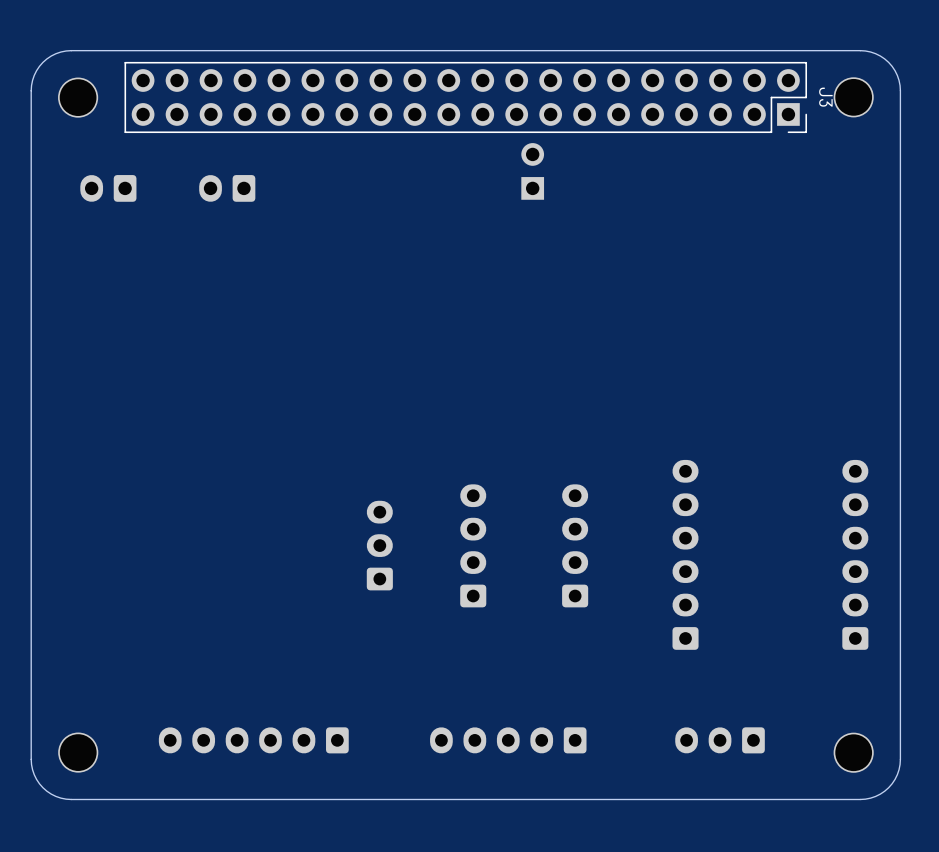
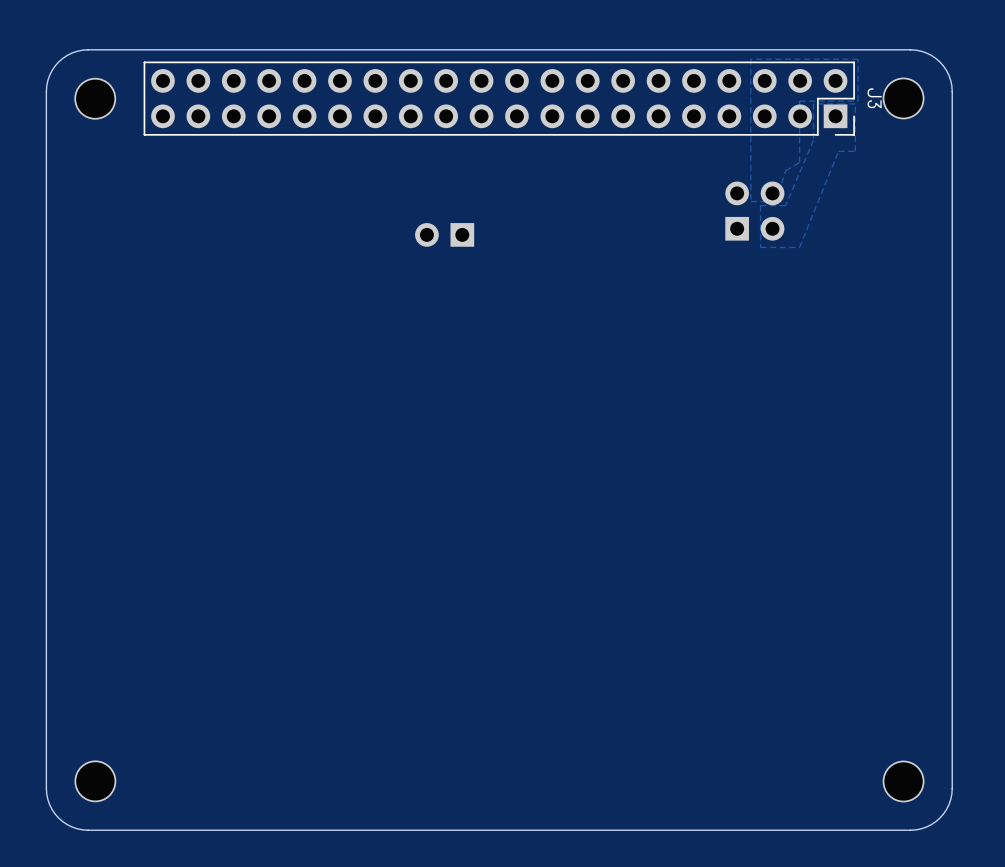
zone outline: none -> (858, 59) (858, 101) (799, 101) (799, 162) (785, 170) (775, 201) (750, 201) (750, 59) (858, 59)
zone outline: none -> (855, 103) (855, 151) (838, 151) (799, 247) (760, 247) (760, 205) (785, 205) (813, 140) (813, 103) (855, 103)
part rotation: 0° (532, 171) -> 90° counterclockwise (444, 234)
part position: (532, 171) -> (444, 234)
part: (108, 188) -> none
part: (227, 188) -> none
part: none -> (754, 211)
part: (379, 545) -> none
part: (473, 545) -> none
part: (575, 545) -> none
part: (685, 554) -> none
part: (855, 554) -> none
part: (253, 740) -> none
part: (508, 740) -> none
part: (720, 740) -> none

